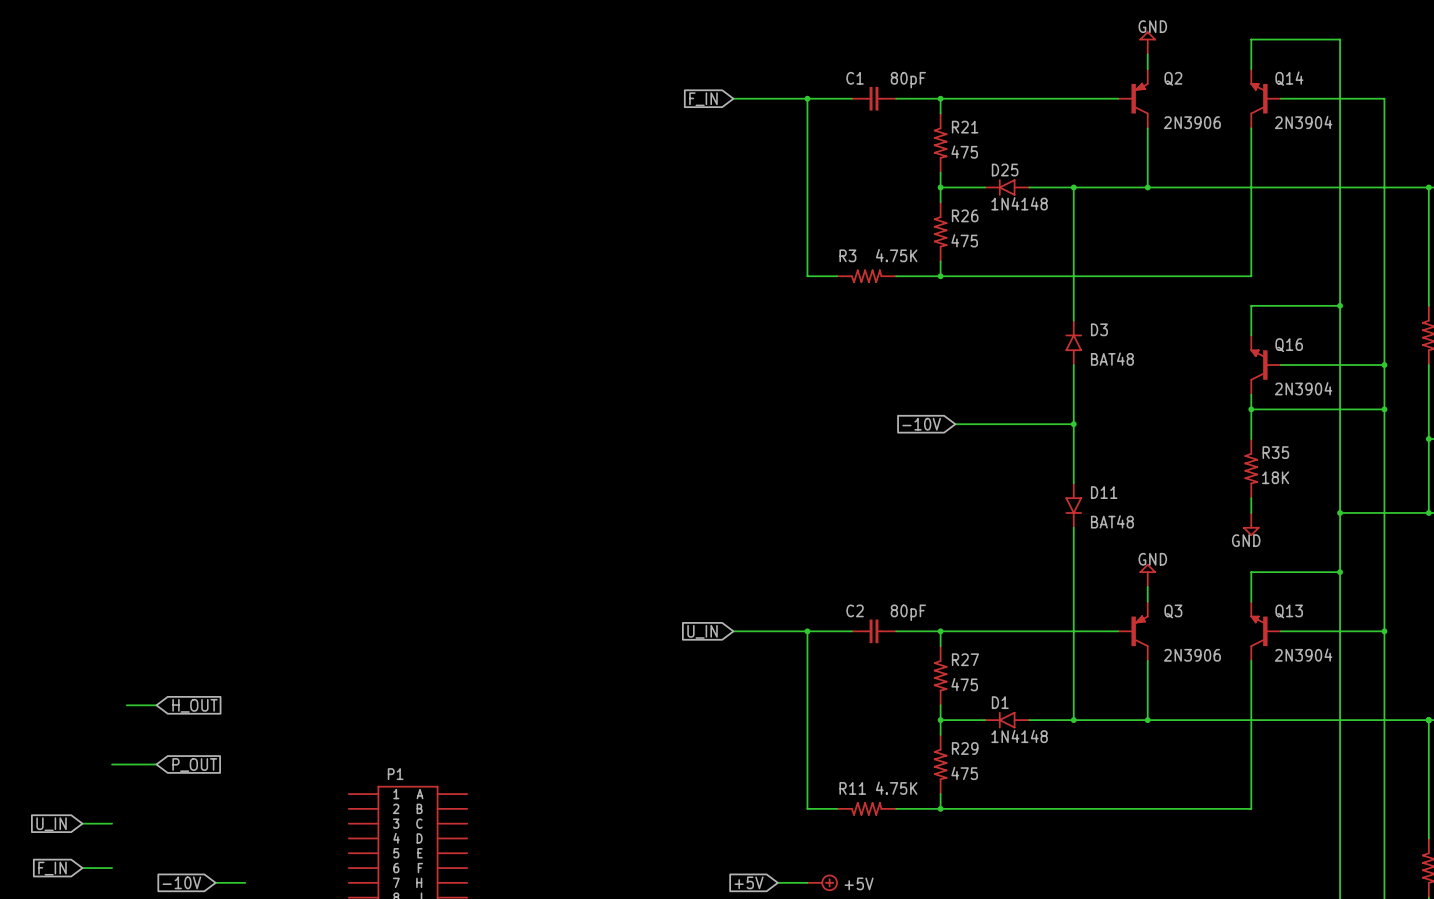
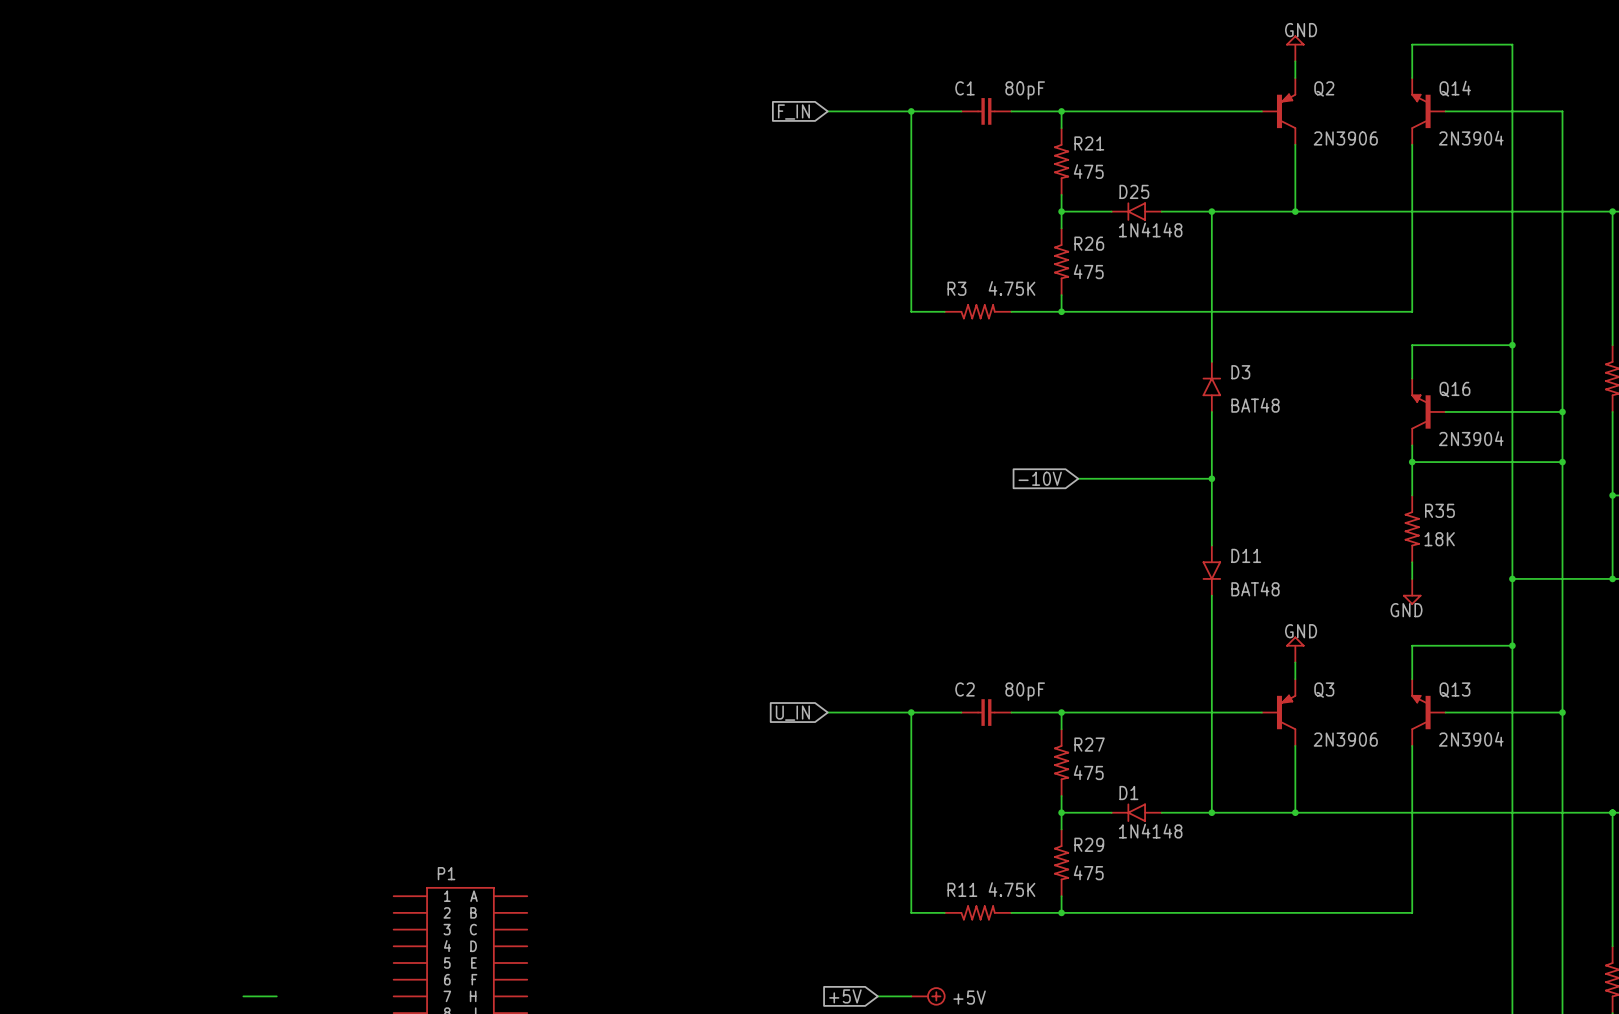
wire: (126, 705) (156, 705) -> none
global label: H_OUT (195, 705) -> none
wire: (112, 764) (156, 764) -> none
global label: P_OUT (194, 765) -> none
wire: (82, 823) (112, 823) -> none
global label: U_IN (51, 824) -> none
global label: F_IN (52, 868) -> none
wire: (82, 868) (112, 868) -> none
global label: -10V (181, 882) -> none

